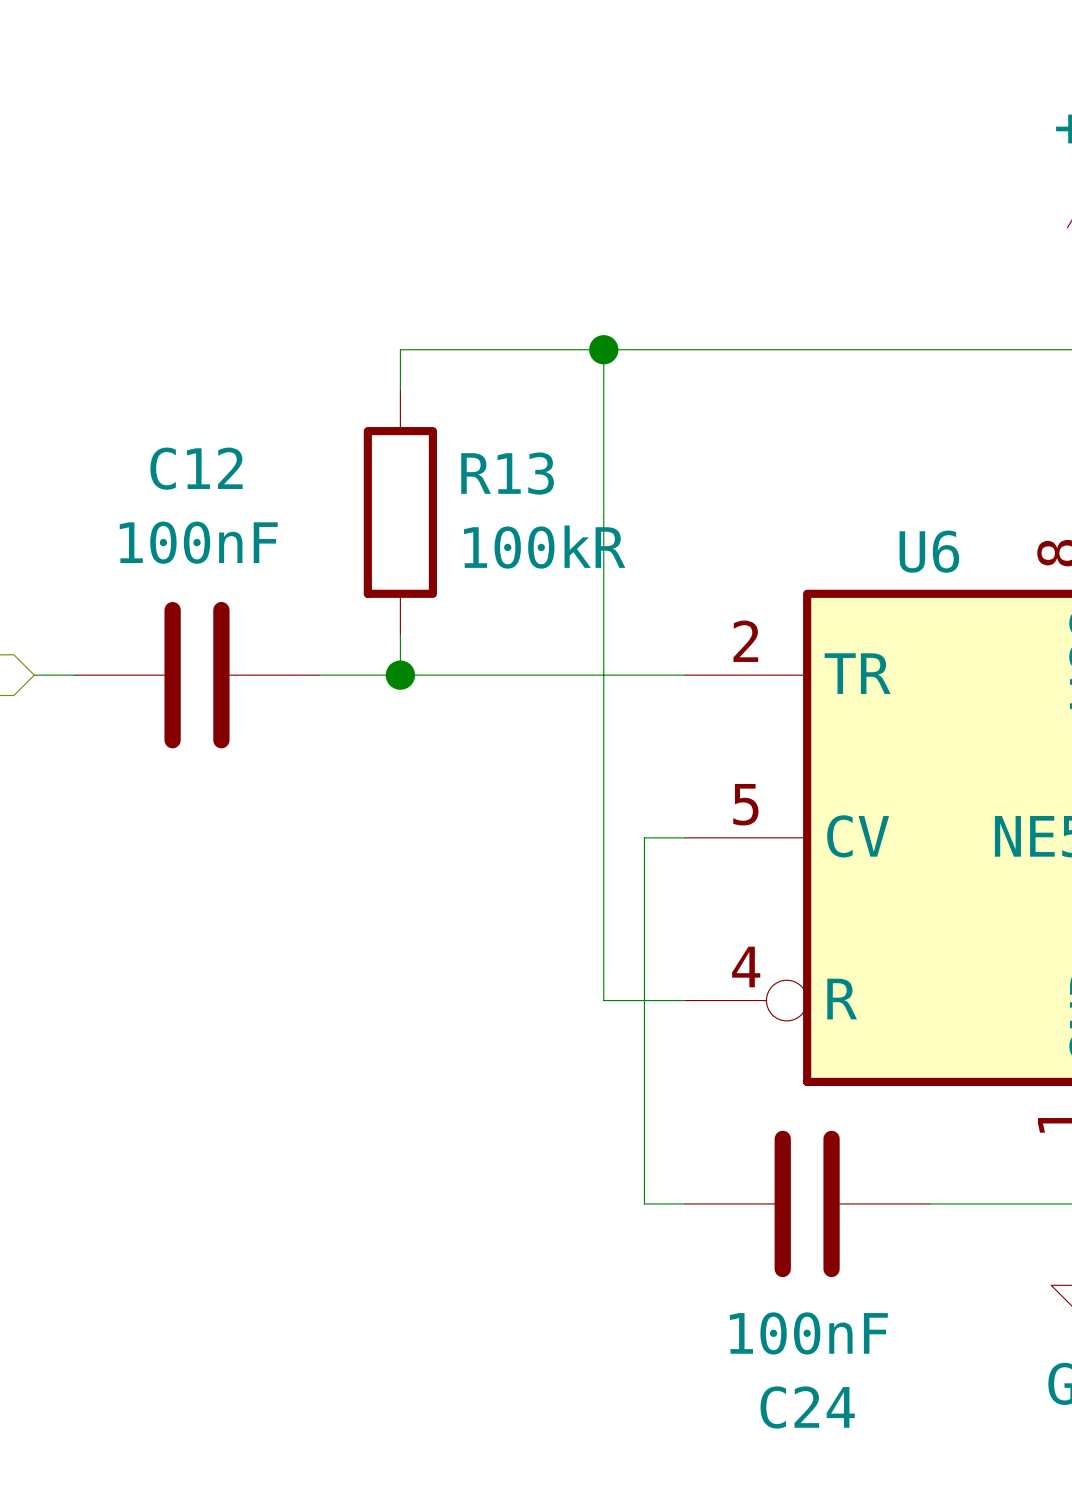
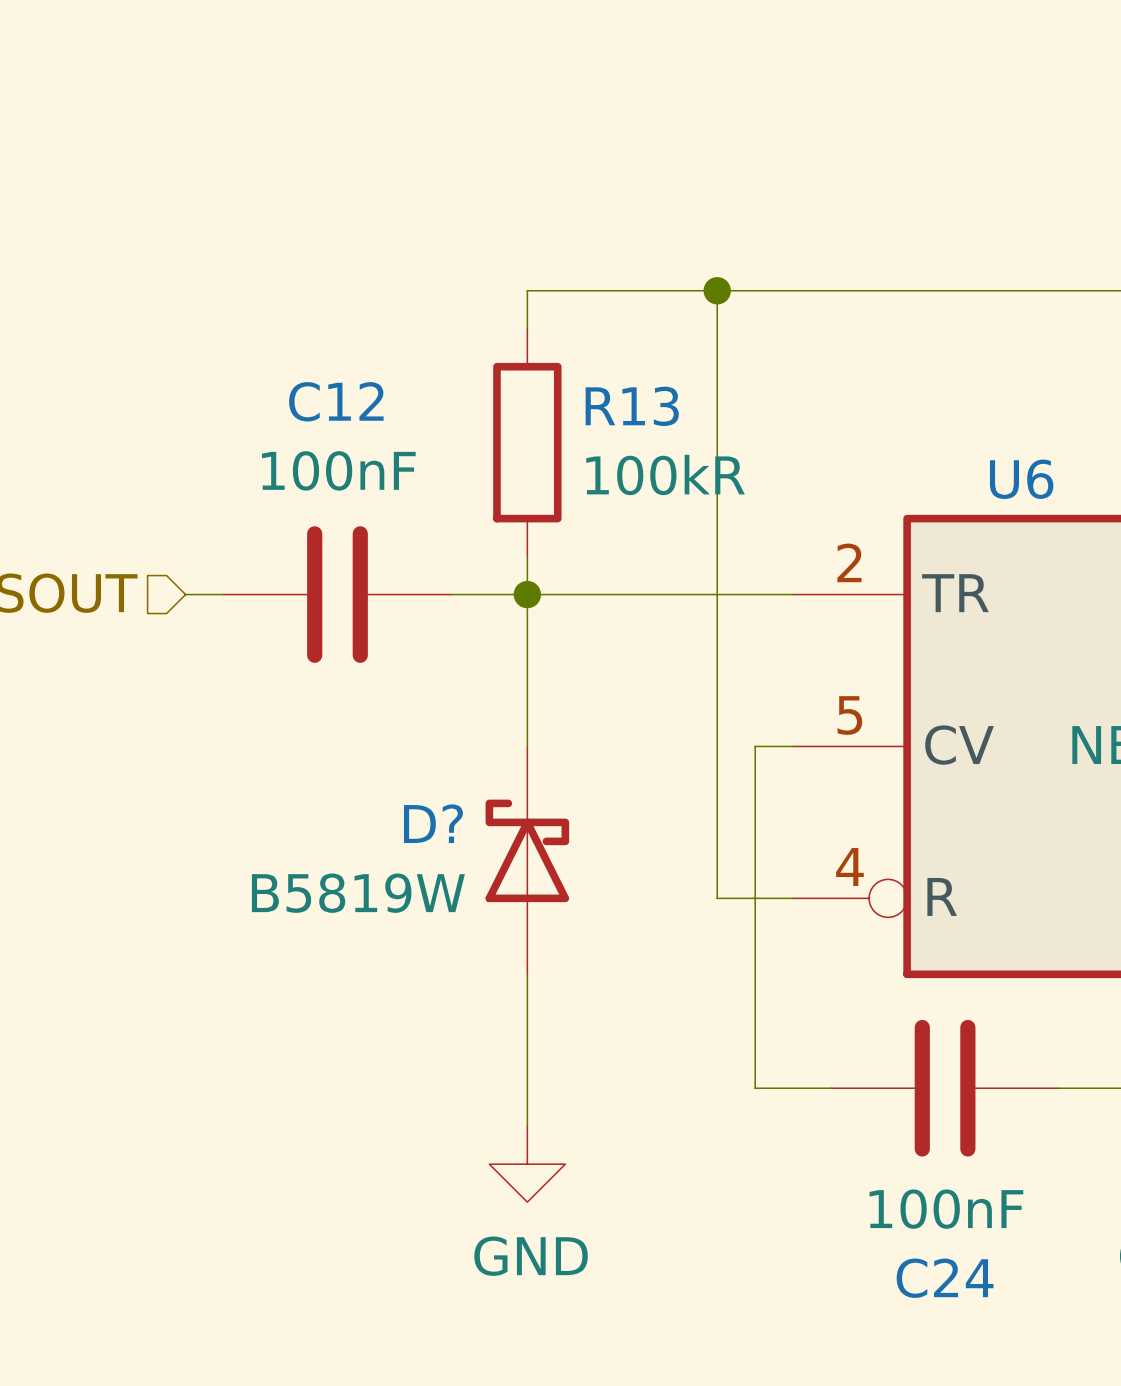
wire: none -> (527, 594) (527, 746)
D?: none -> B5819W (527, 860)
wire: none -> (527, 974) (527, 1126)
C24 position: (807, 1203) -> (945, 1088)
power symbol: none -> GND (527, 1164)

